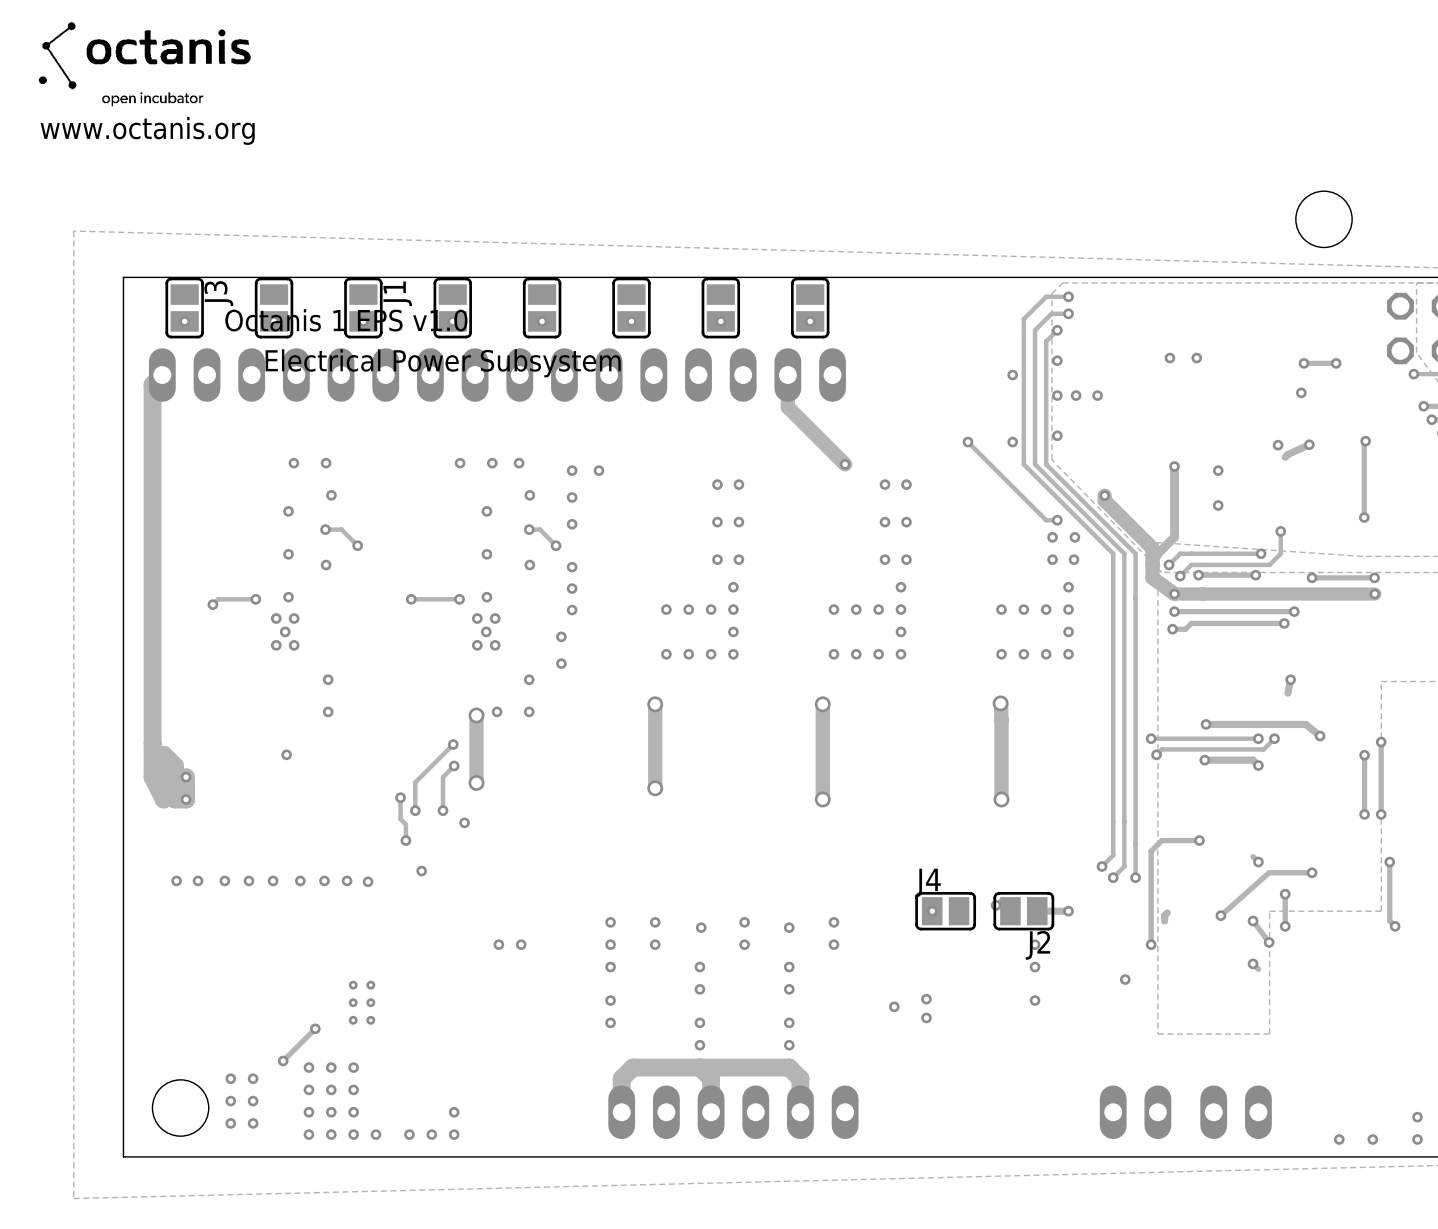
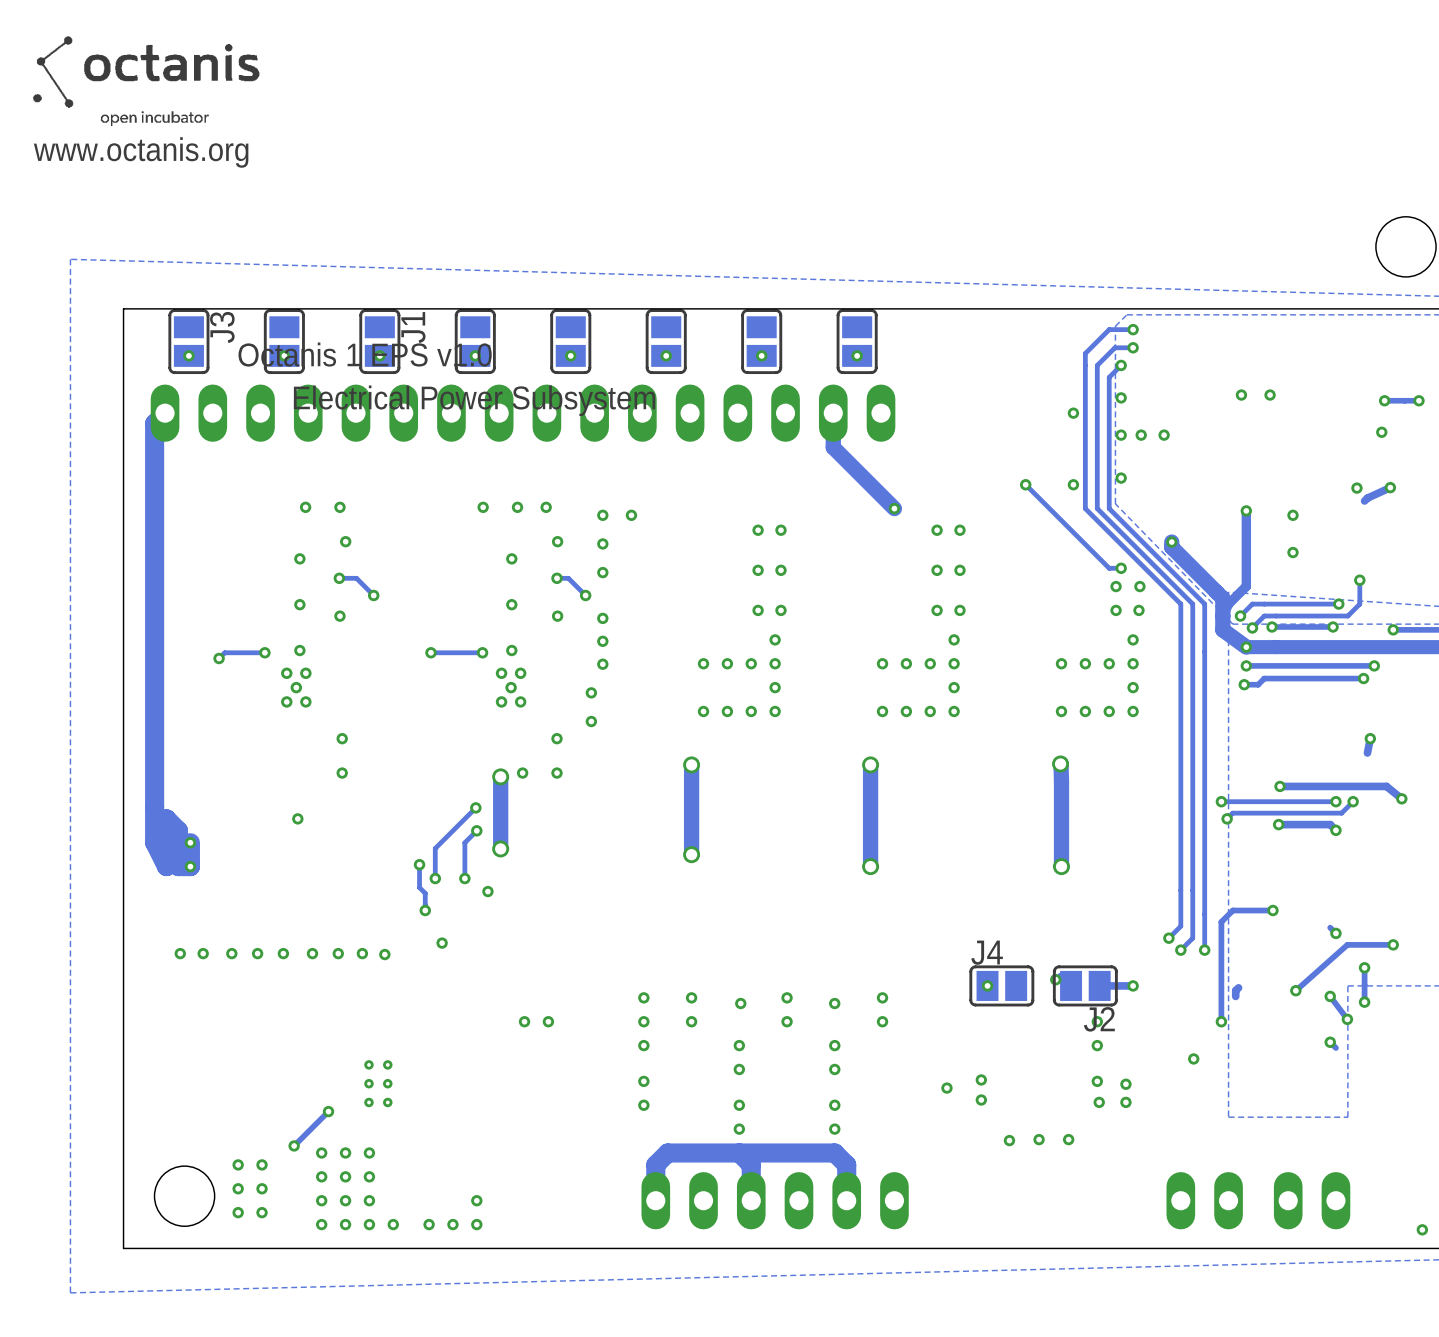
via: none -> (1125, 1084)
via: none -> (1099, 1102)
via: none -> (1125, 1102)
via: none -> (1009, 1140)
via: none -> (1039, 1139)
via: none -> (1068, 1139)

